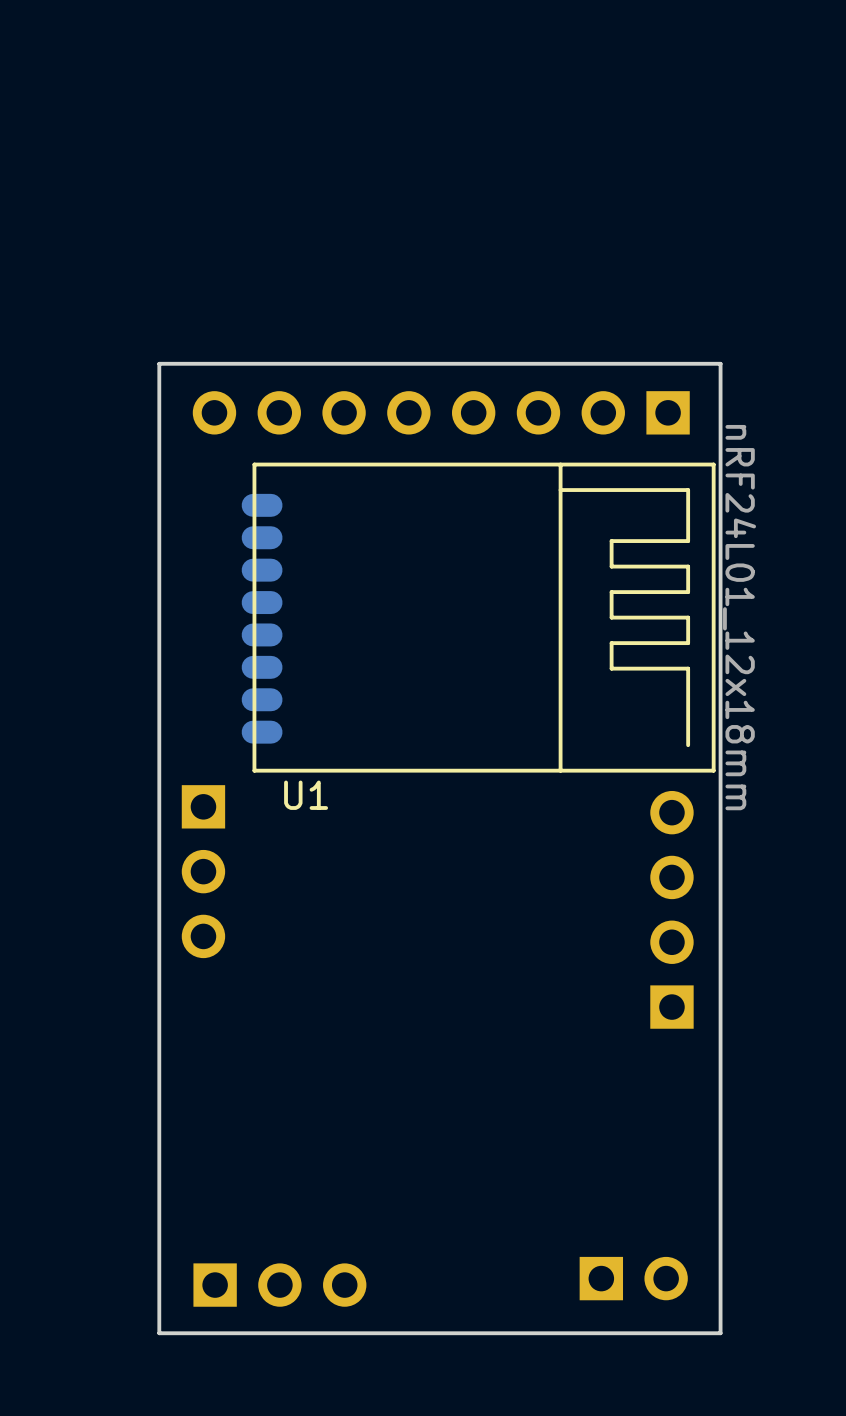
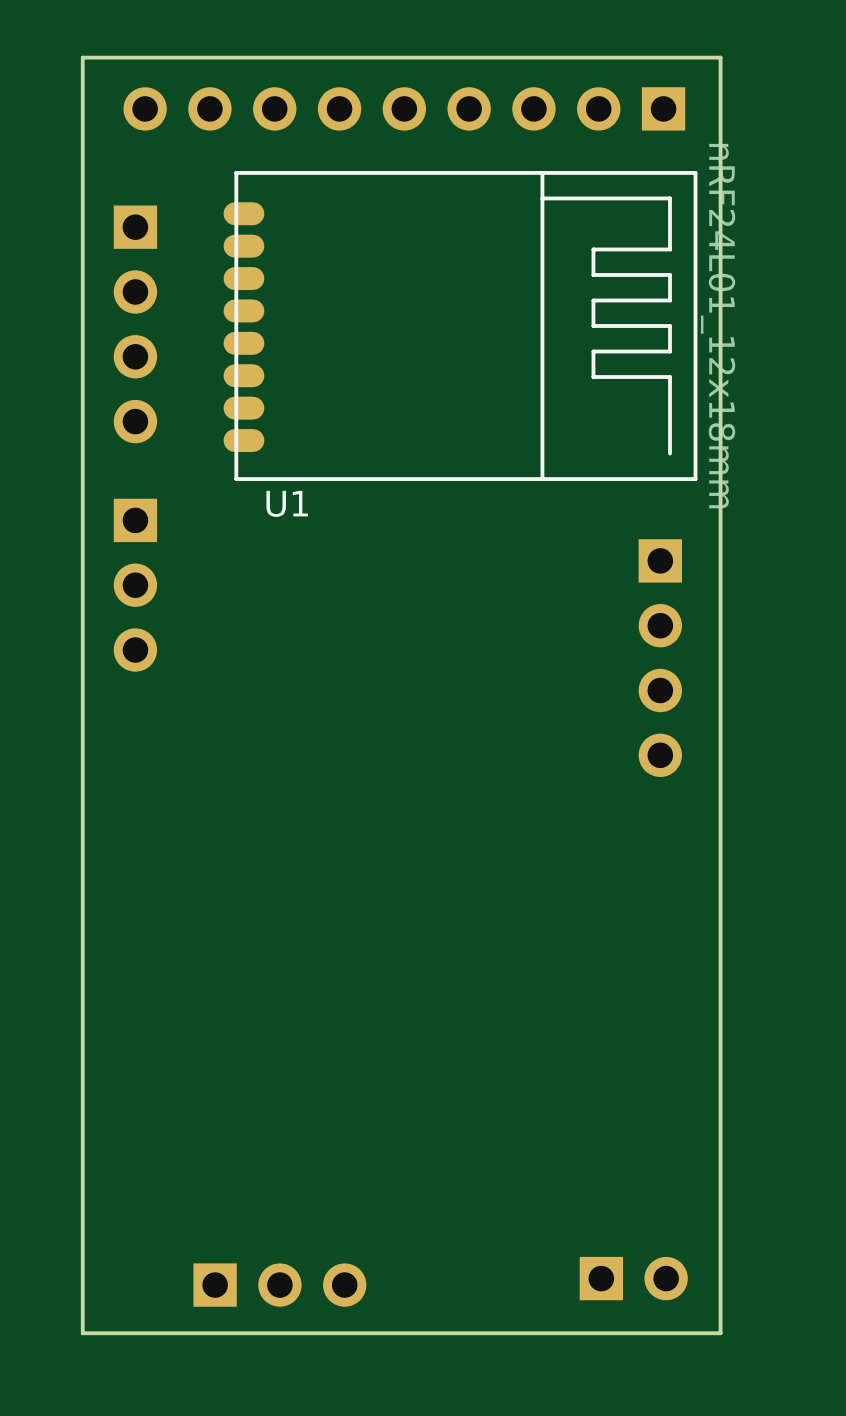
part: none -> (404, 108)
part: none -> (135, 324)
board edge: (720, 363) (159, 363) (159, 1333) -> (720, 363) (720, 57) (82, 57) (82, 1333) (159, 1333)
part: (441, 412) -> none
U1 position: (478, 617) -> (460, 326)
part position: (203, 871) -> (135, 585)
part rotation: 0° (671, 909) -> 180° (660, 658)
part position: (671, 909) -> (660, 658)

